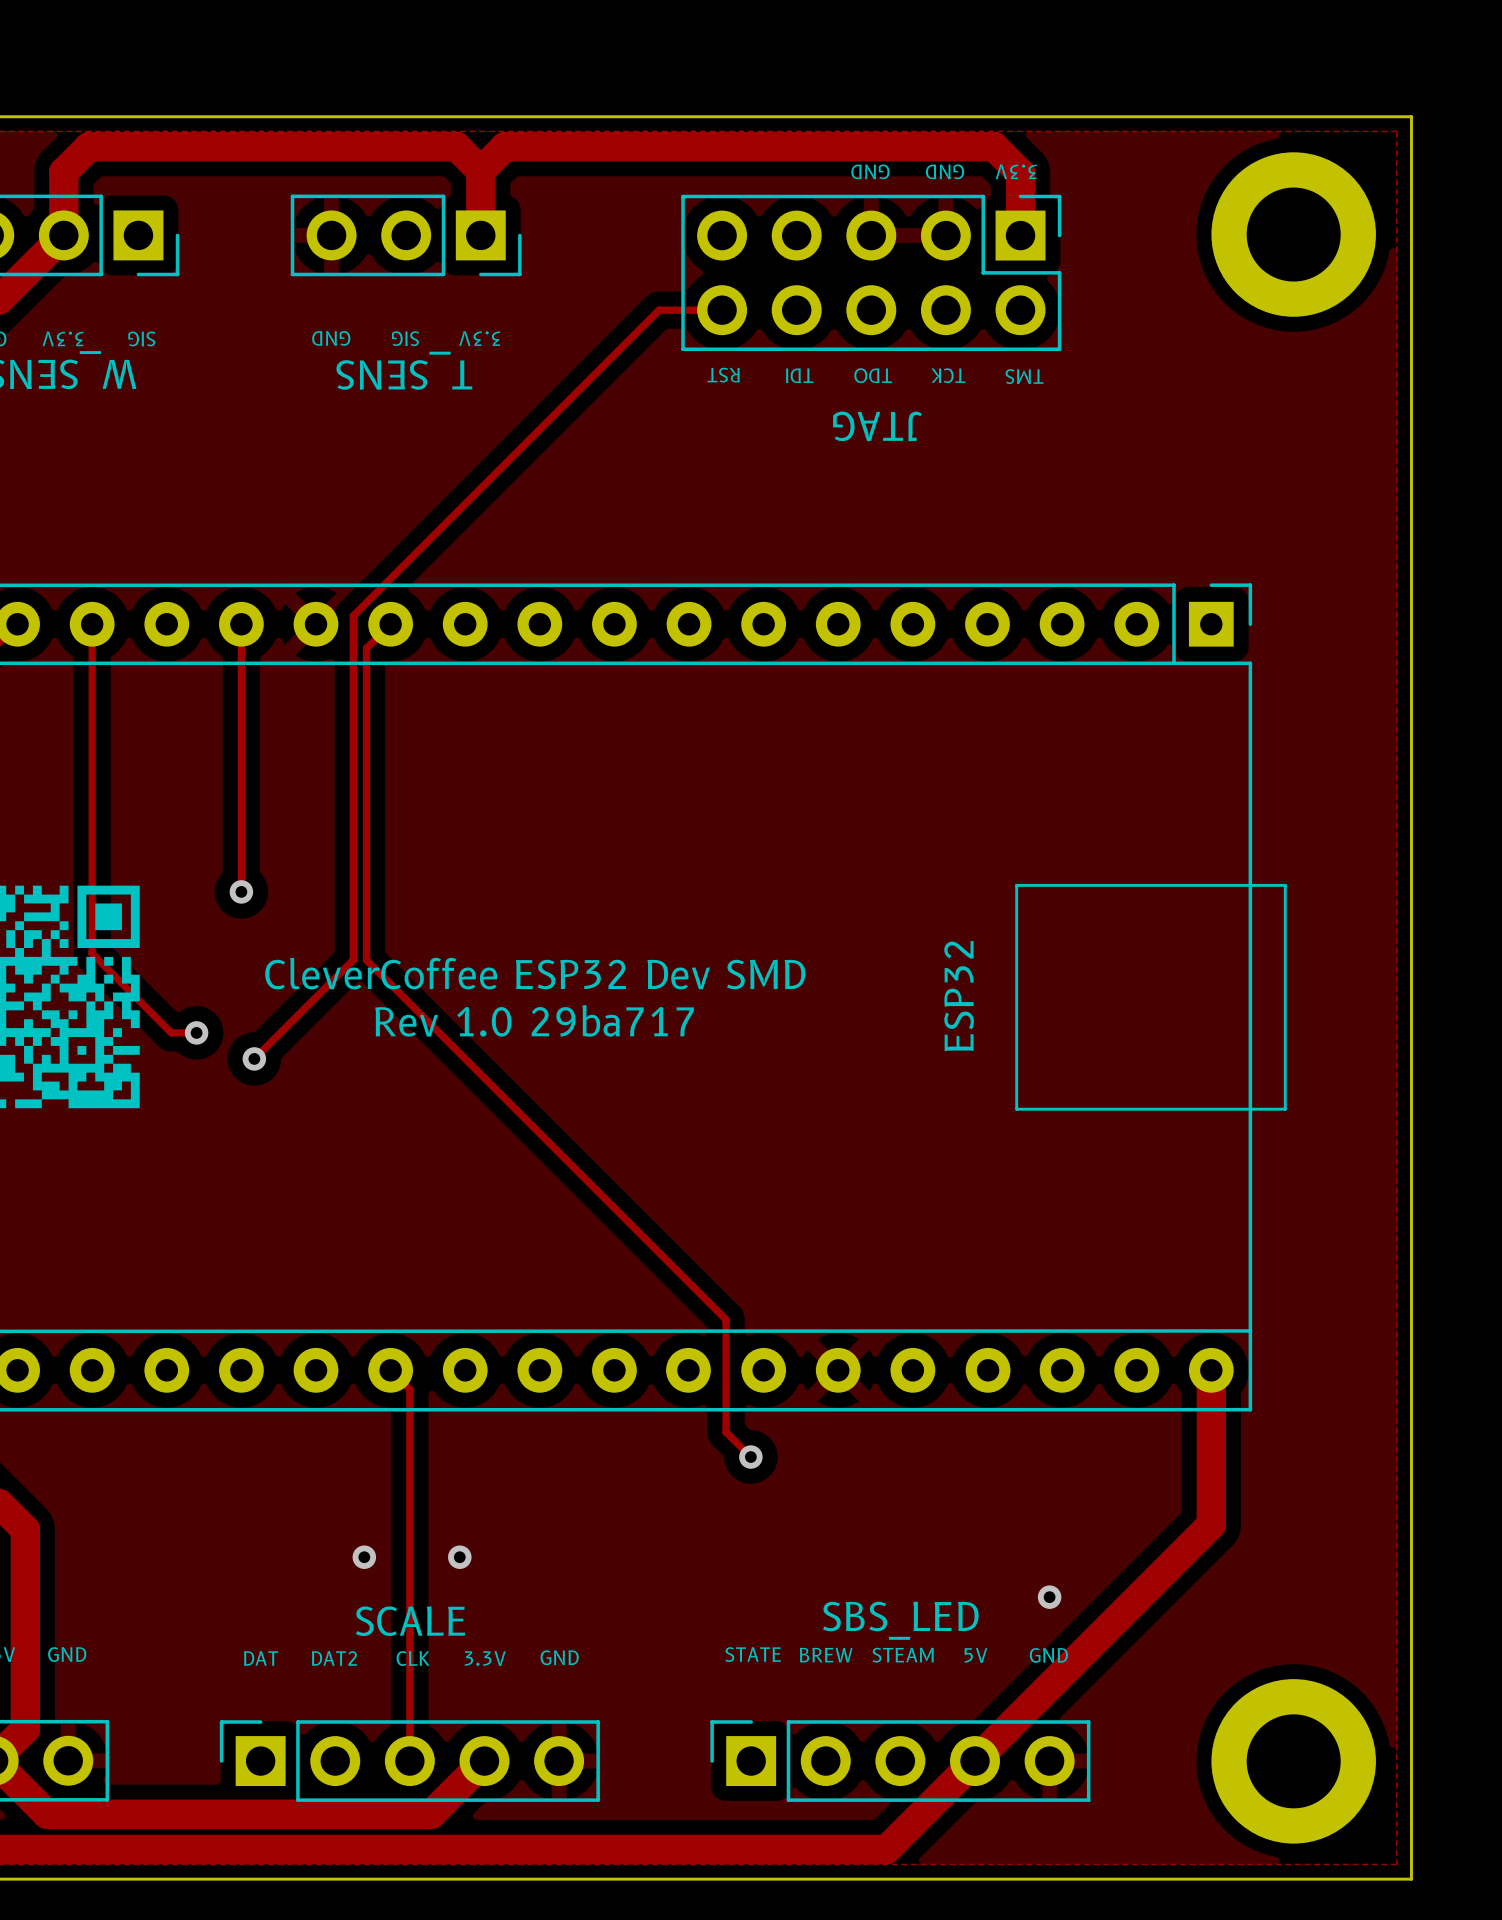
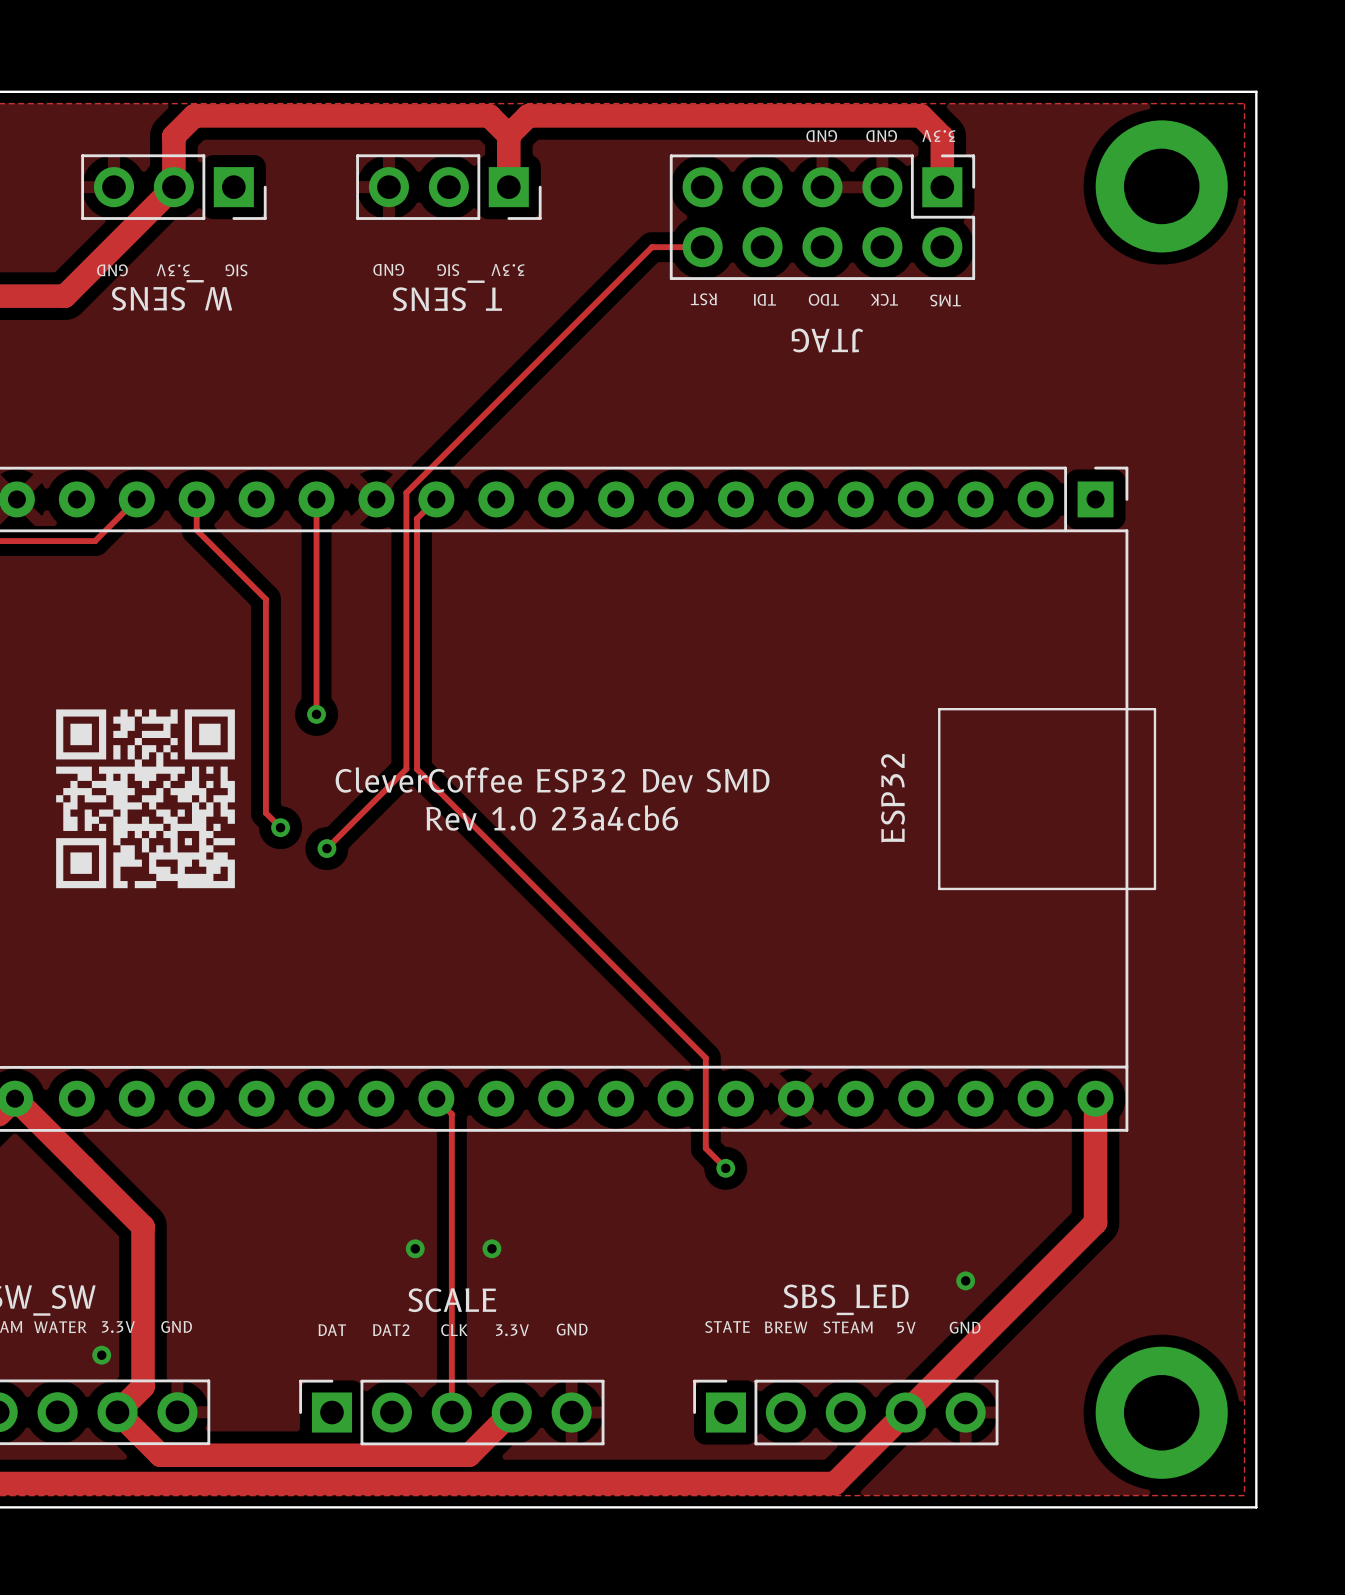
track: (92, 662) (91, 953) (171, 1032) (196, 1032) -> (196, 530) (265, 599) (265, 813) (280, 827)
text: Rev 1.0 29ba717 (534, 1020) -> Rev 1.0 23a4cb6 (552, 818)

